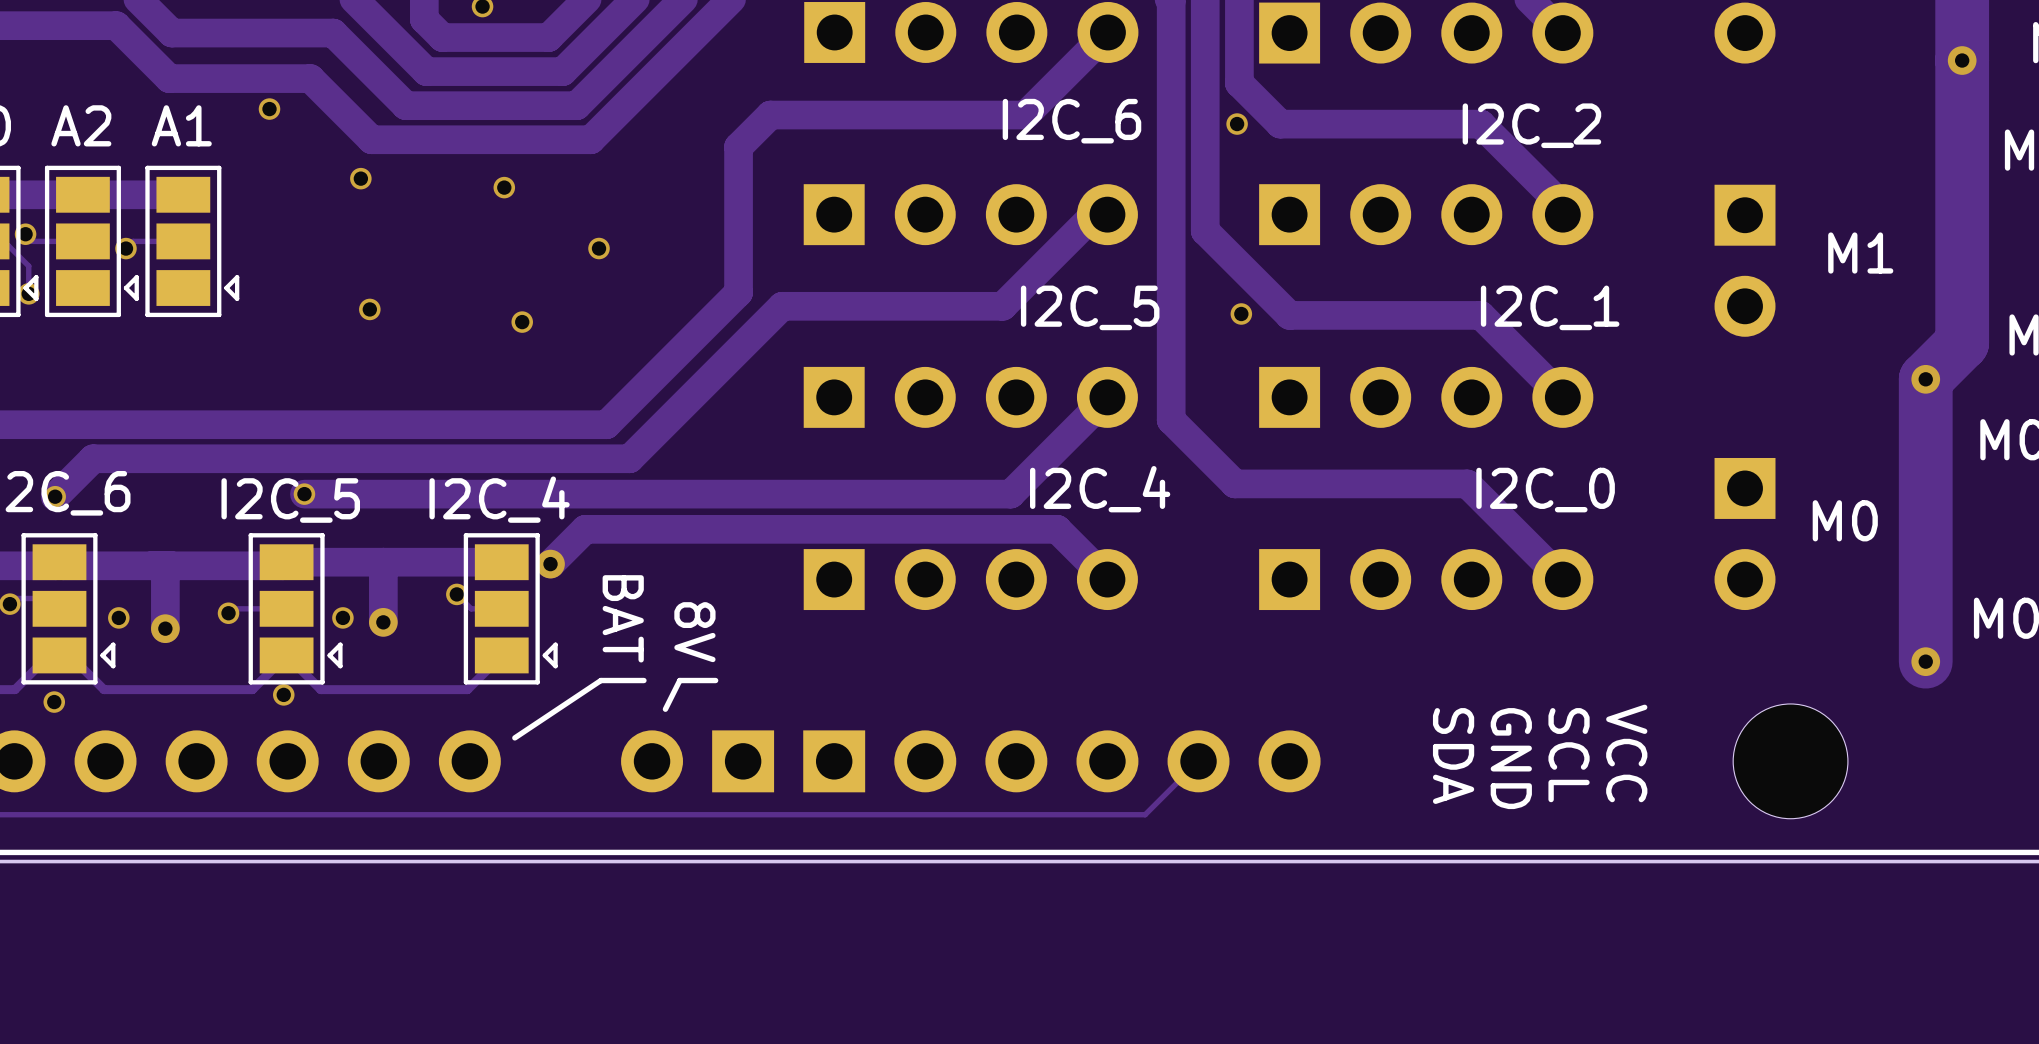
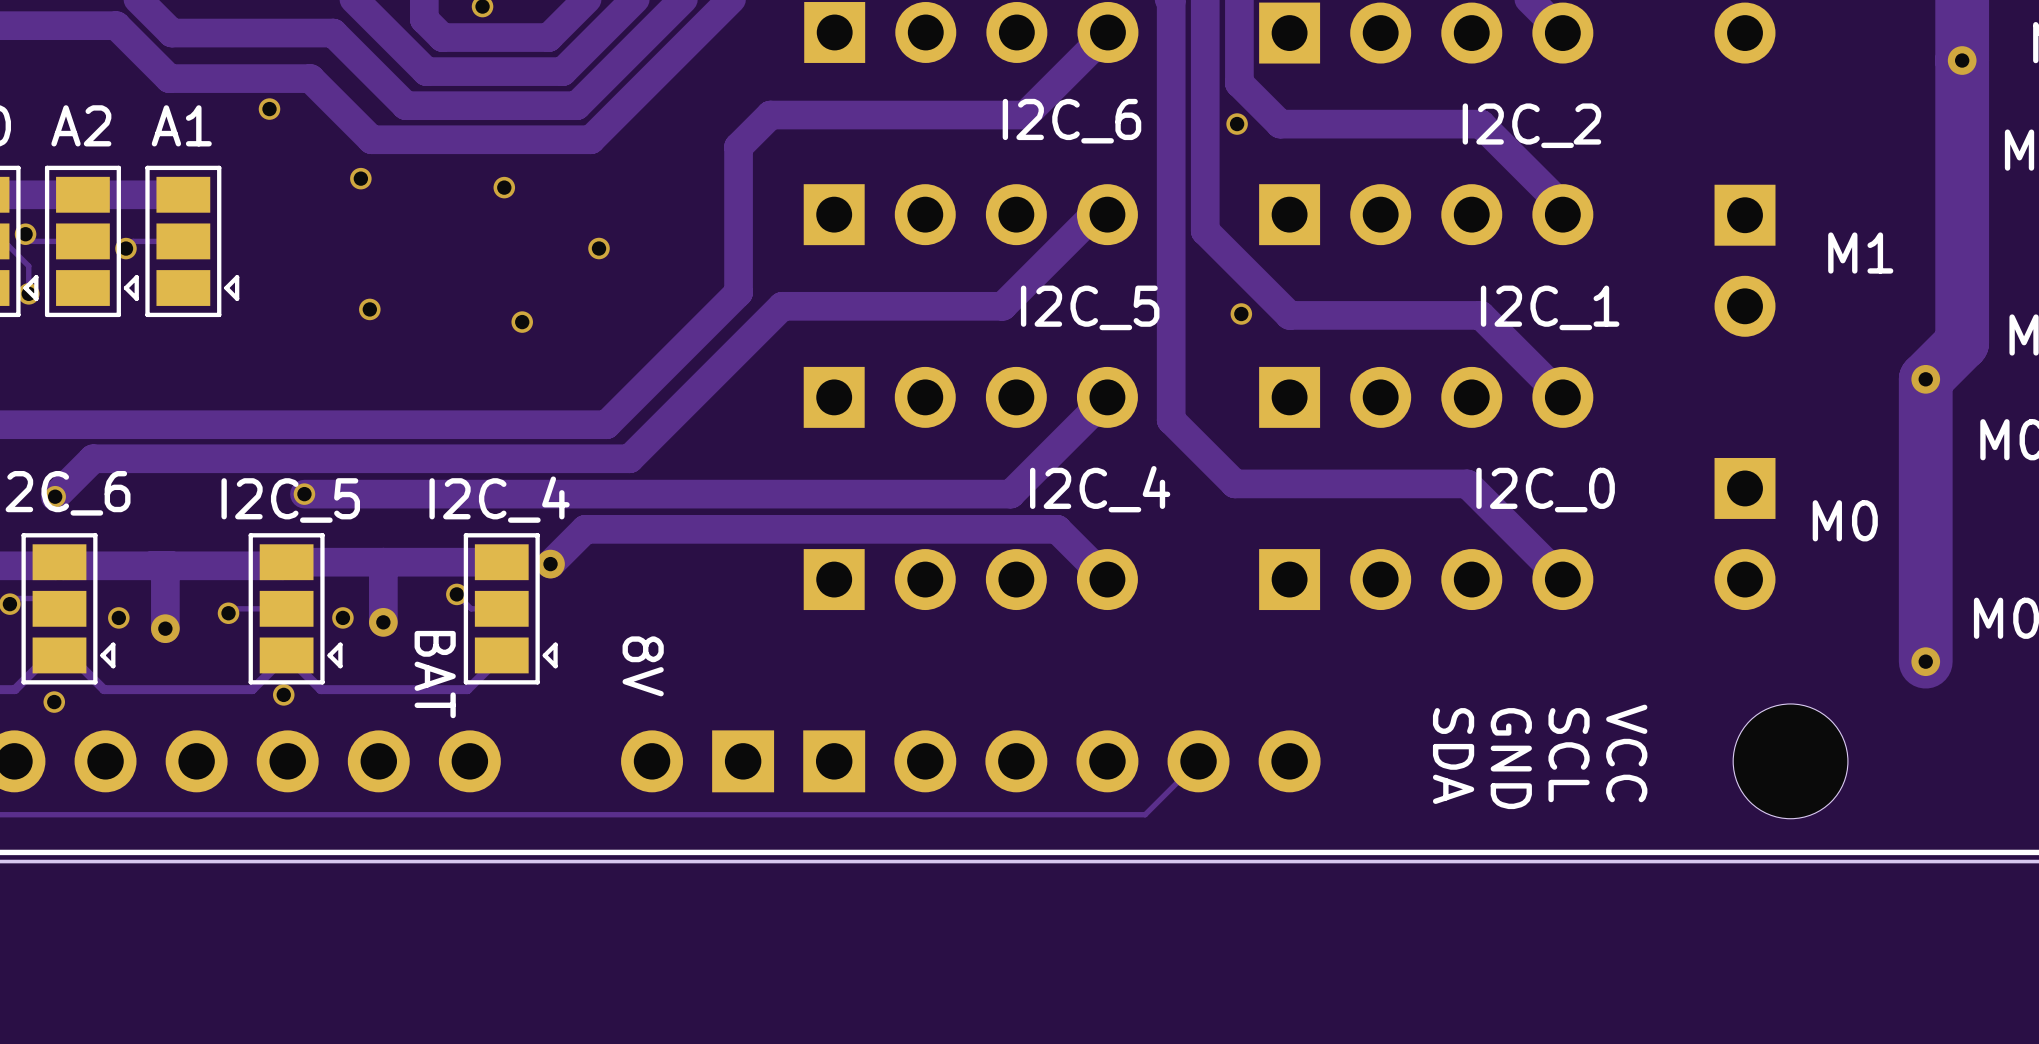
text position: BAT (623, 618) -> BAT (435, 674)
text position: 8V (694, 632) -> 8V (643, 666)
line: (643, 680) (600, 680) (514, 737) -> none
line: (715, 680) (679, 680) (665, 709) -> none

